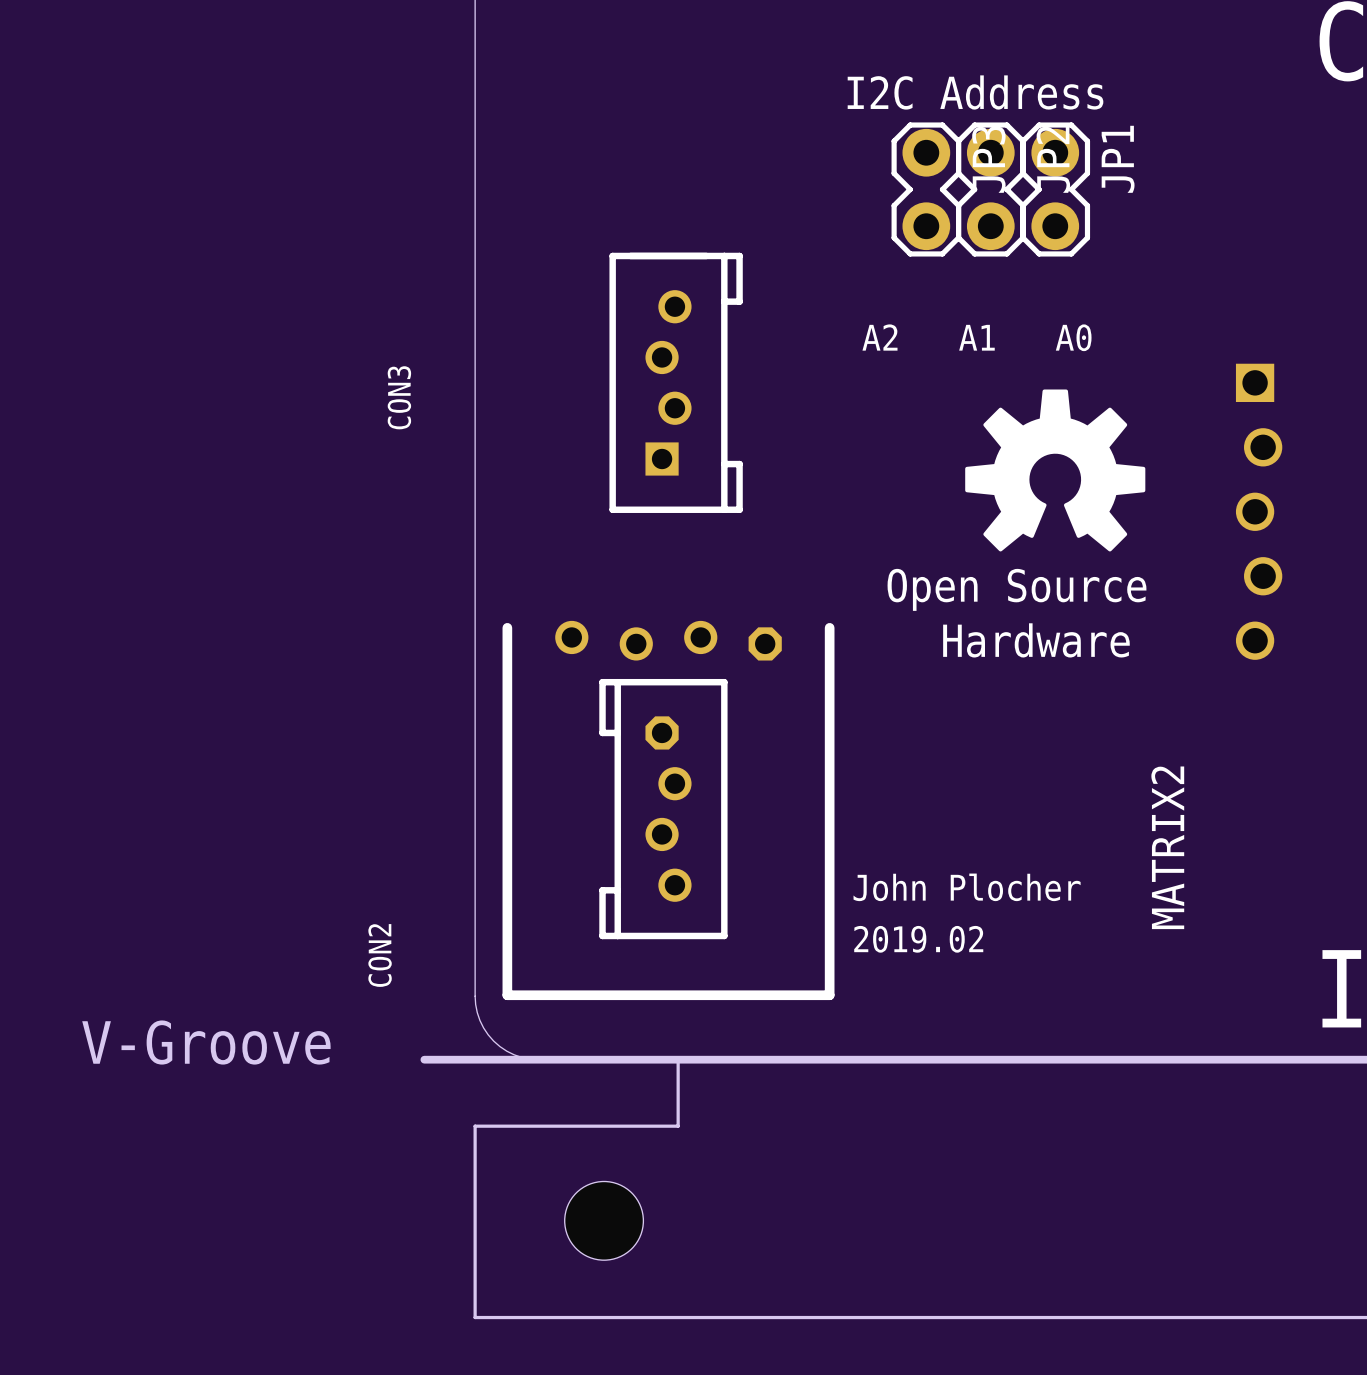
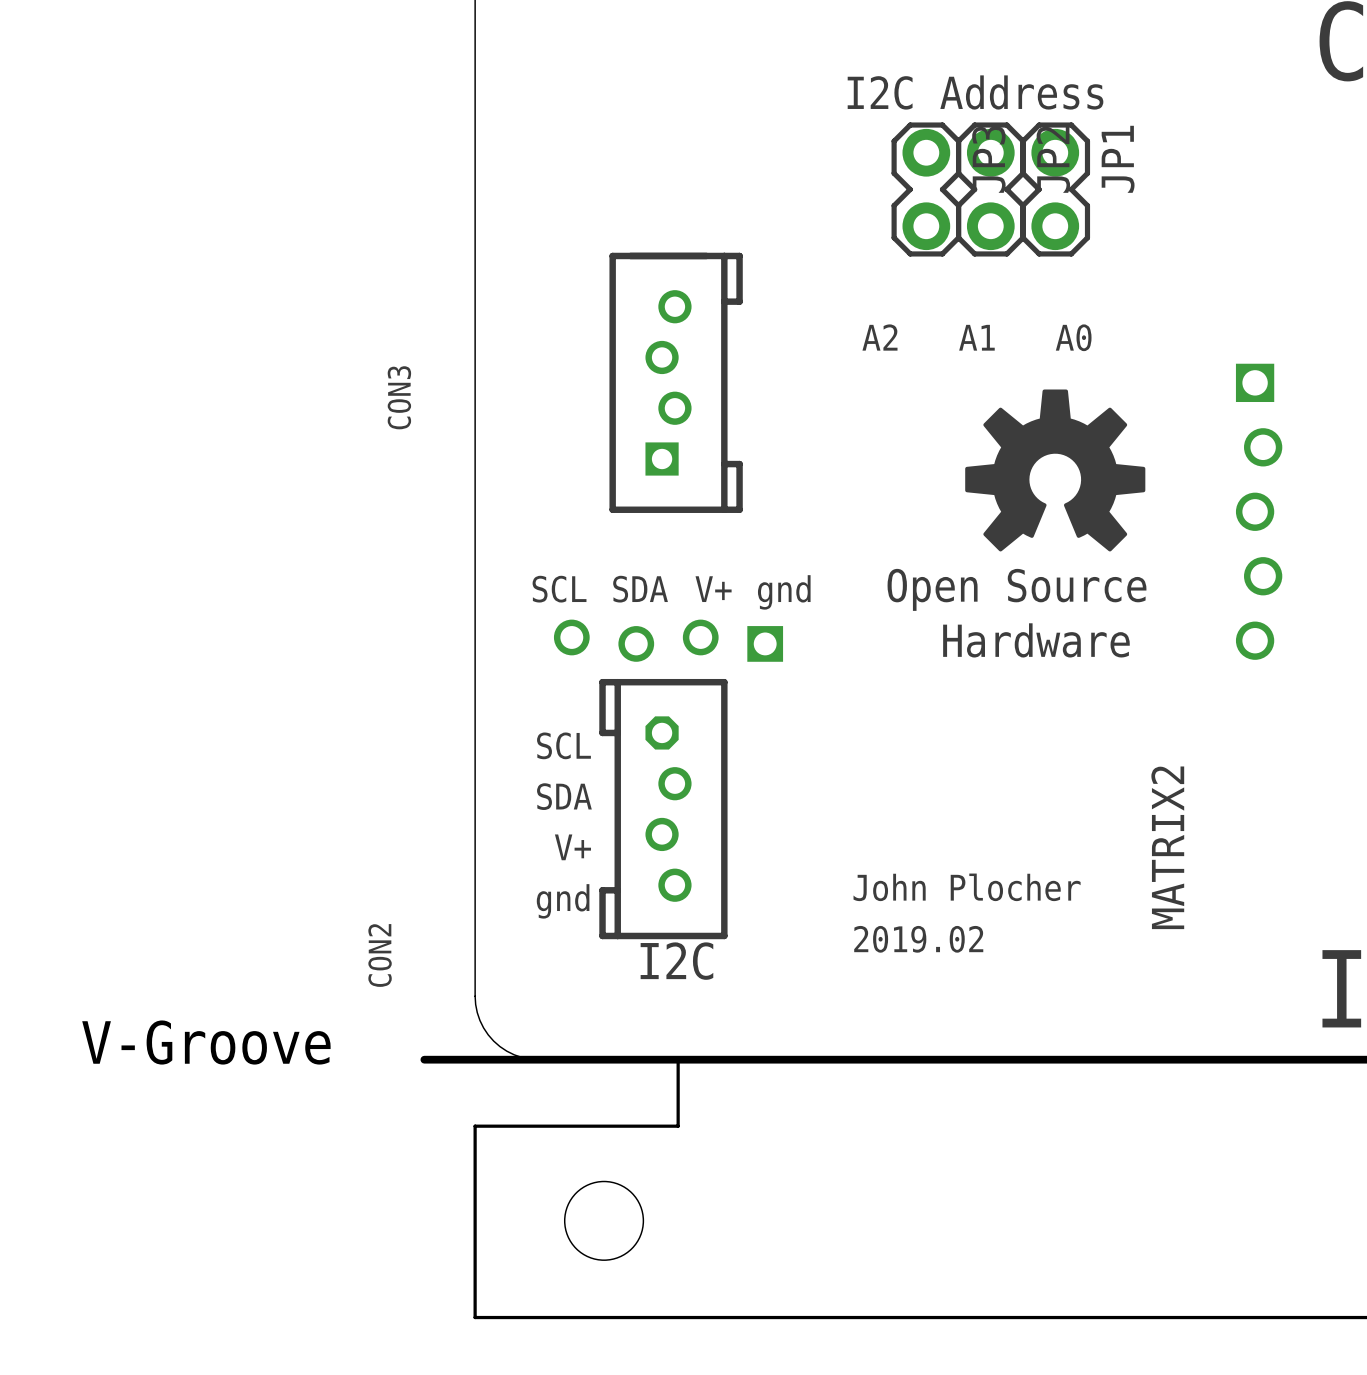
CON2 footprint: [502, 620, 835, 1001] -> [553, 619, 784, 940]

